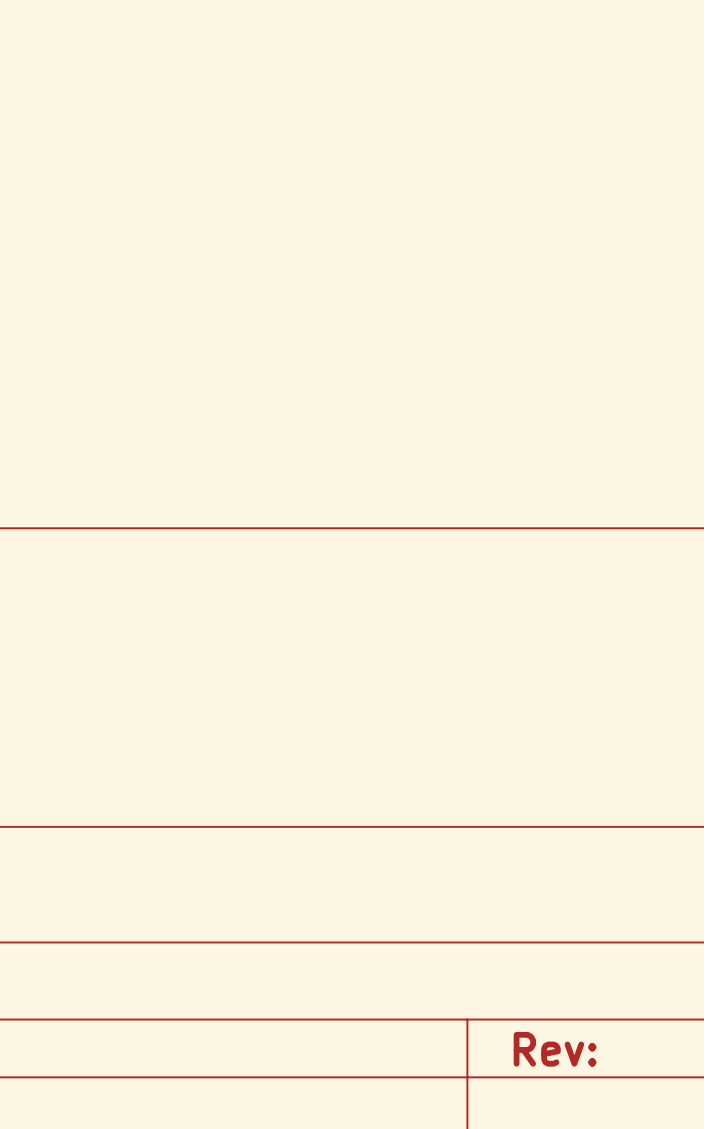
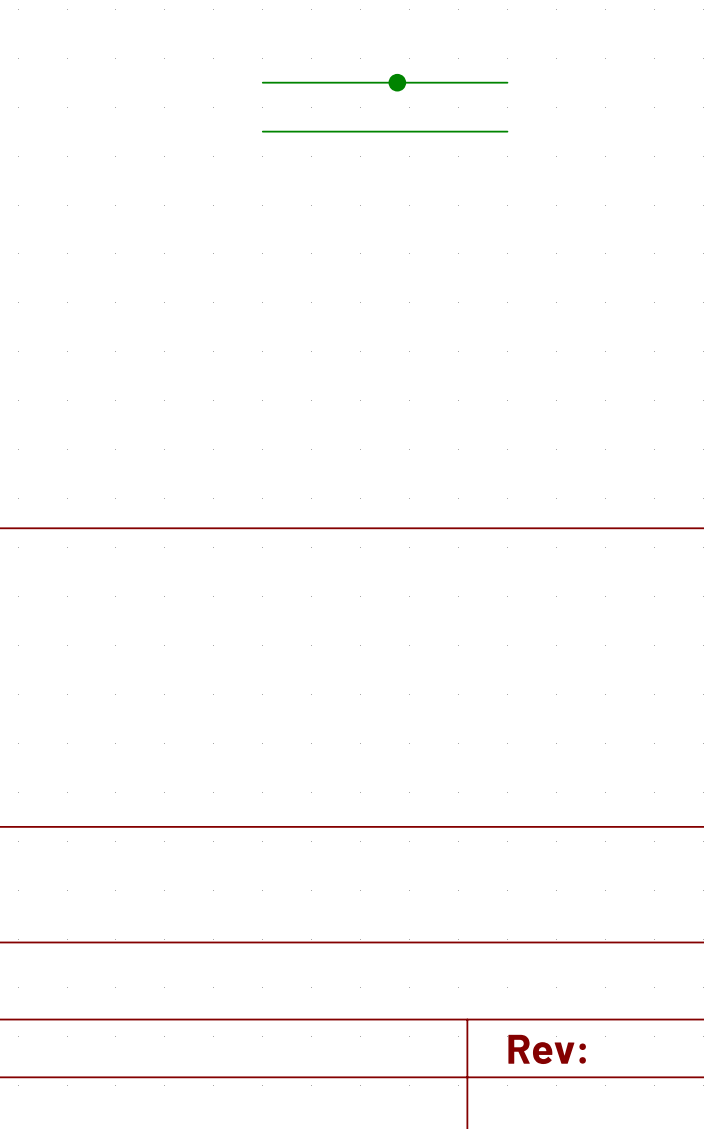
wire: none -> (262, 82) (507, 82)
junction: none -> (397, 82)
wire: none -> (262, 131) (507, 131)

